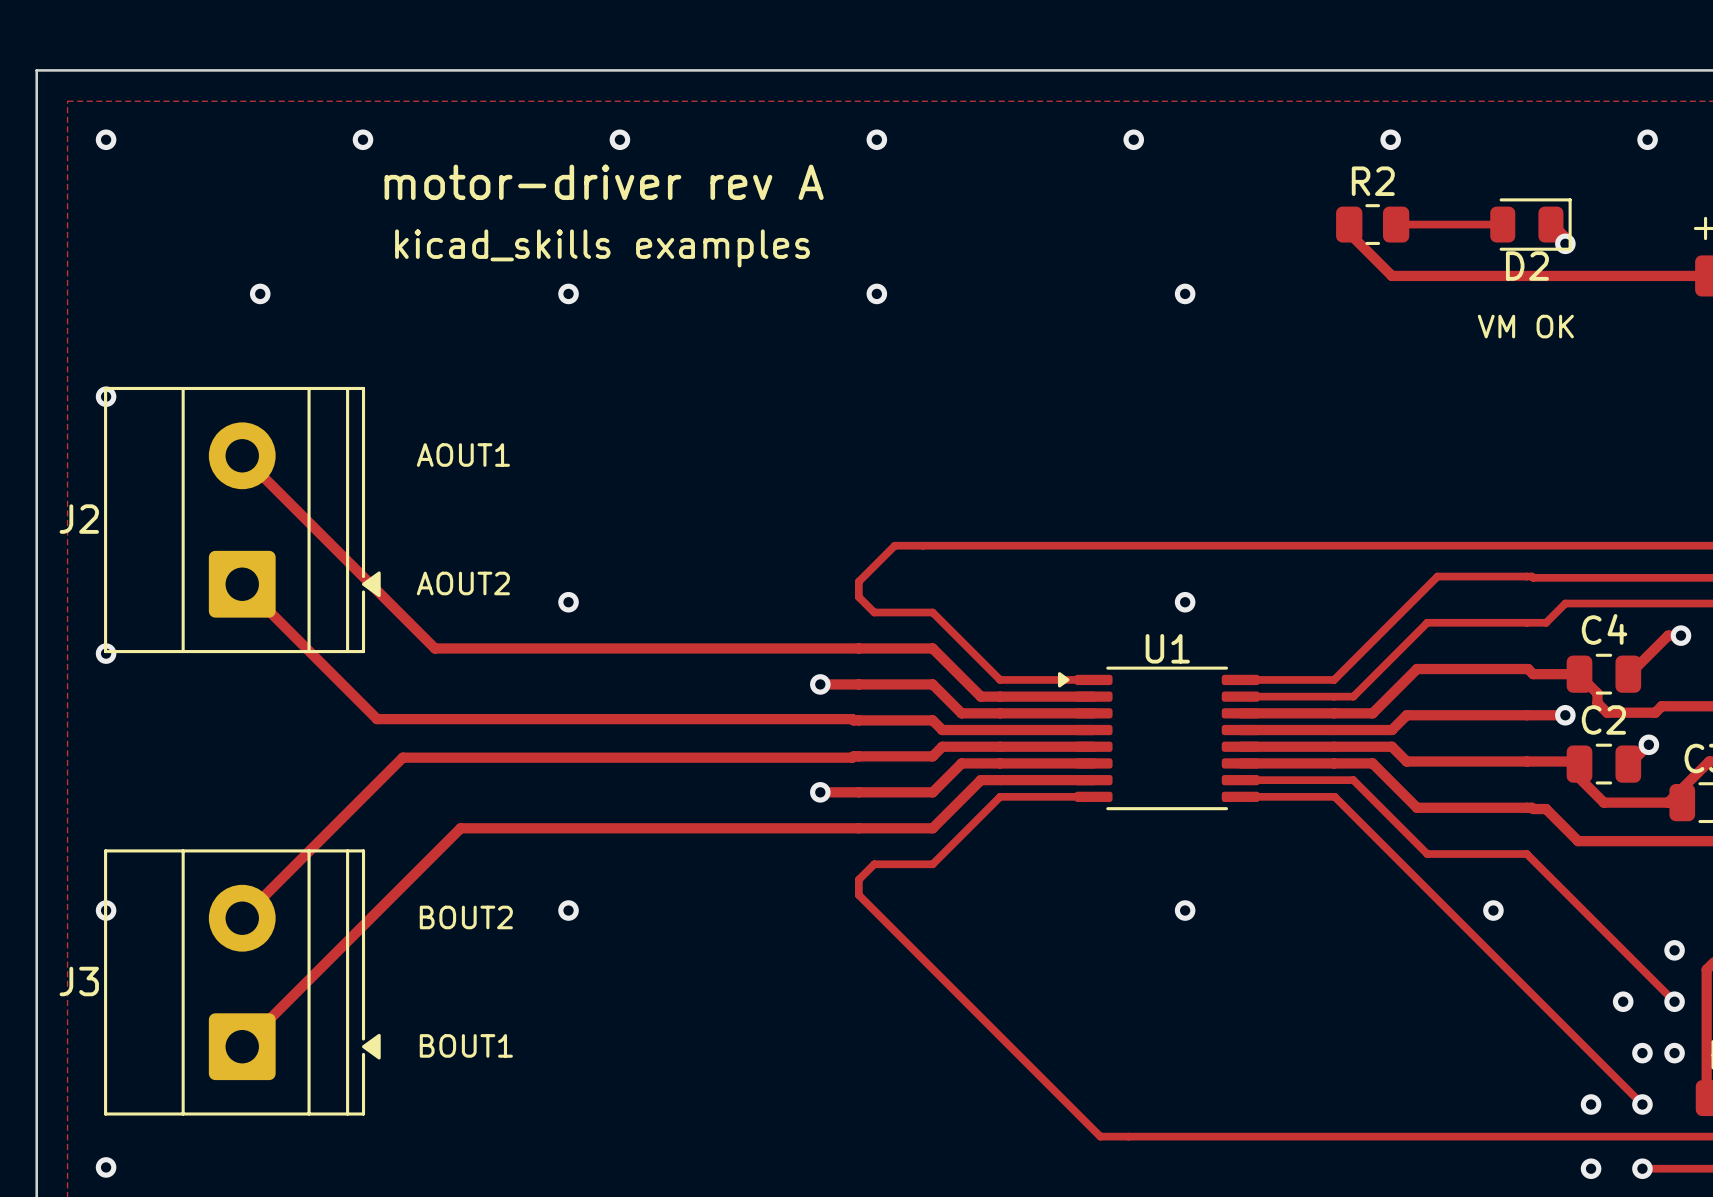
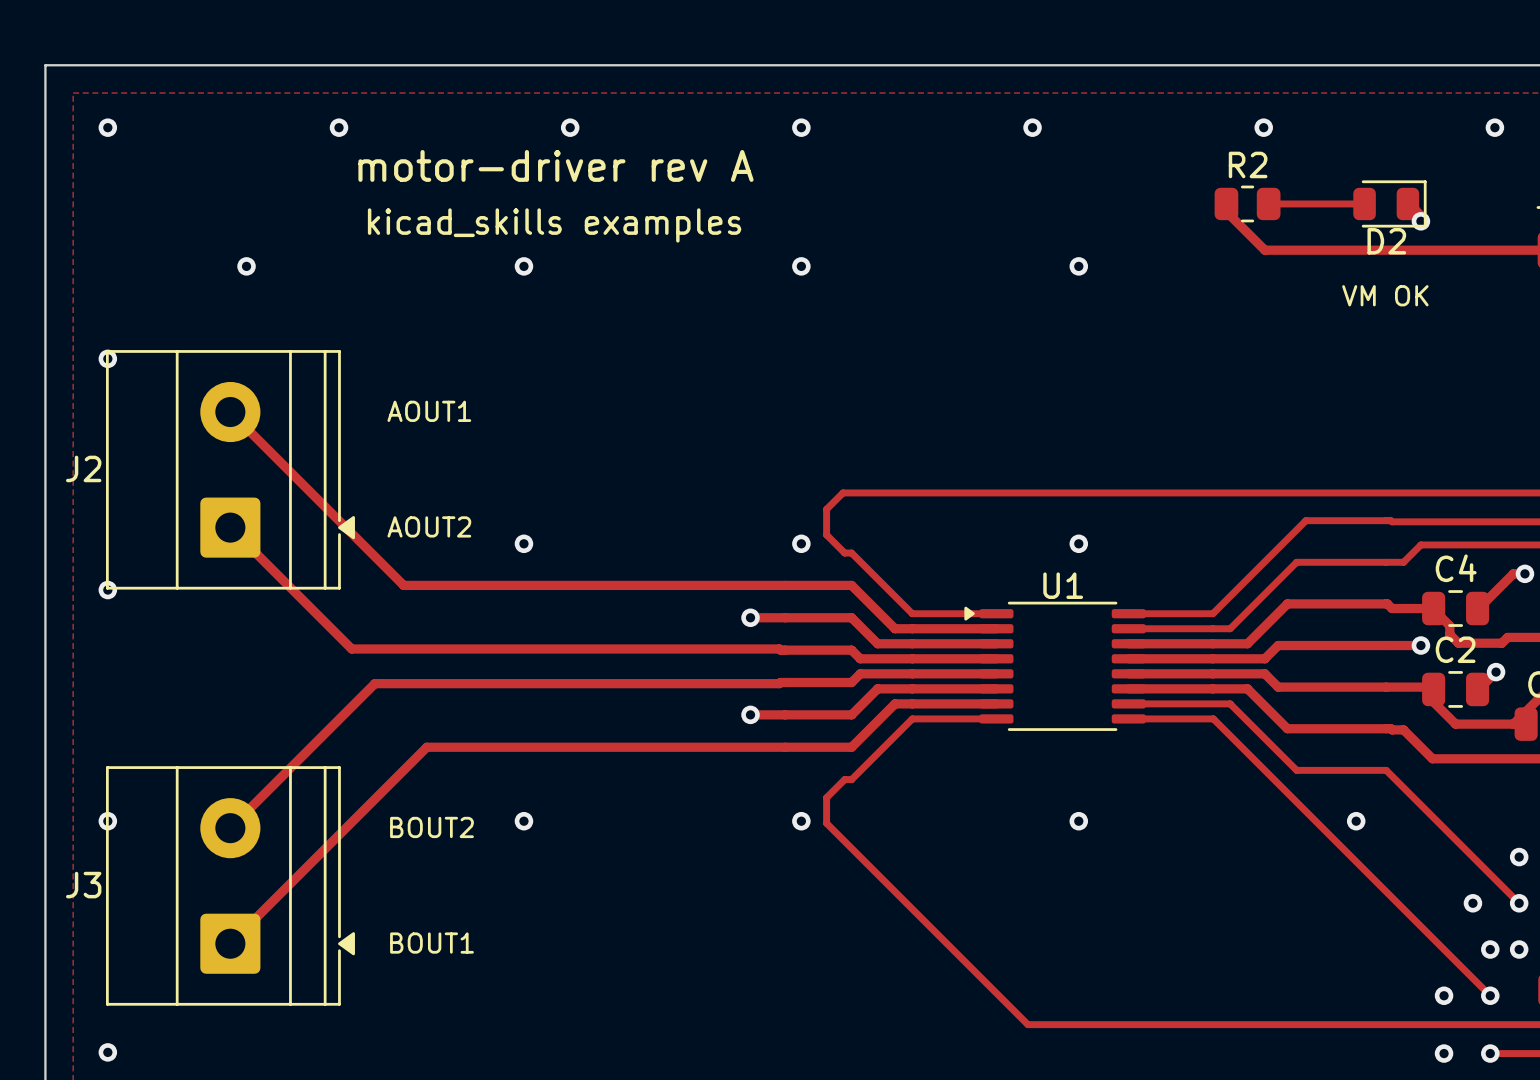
track: (923, 545) (894, 545) (858, 581) (858, 597) (874, 612) (925, 612) -> (842, 492) (826, 509) (826, 534) (844, 553)
via: none -> (801, 543)
track: (925, 864) (874, 864) (858, 879) (858, 895) (1100, 1136) (1128, 1136) -> (844, 779) (826, 797) (826, 823) (1027, 1024)
via: none -> (801, 821)

